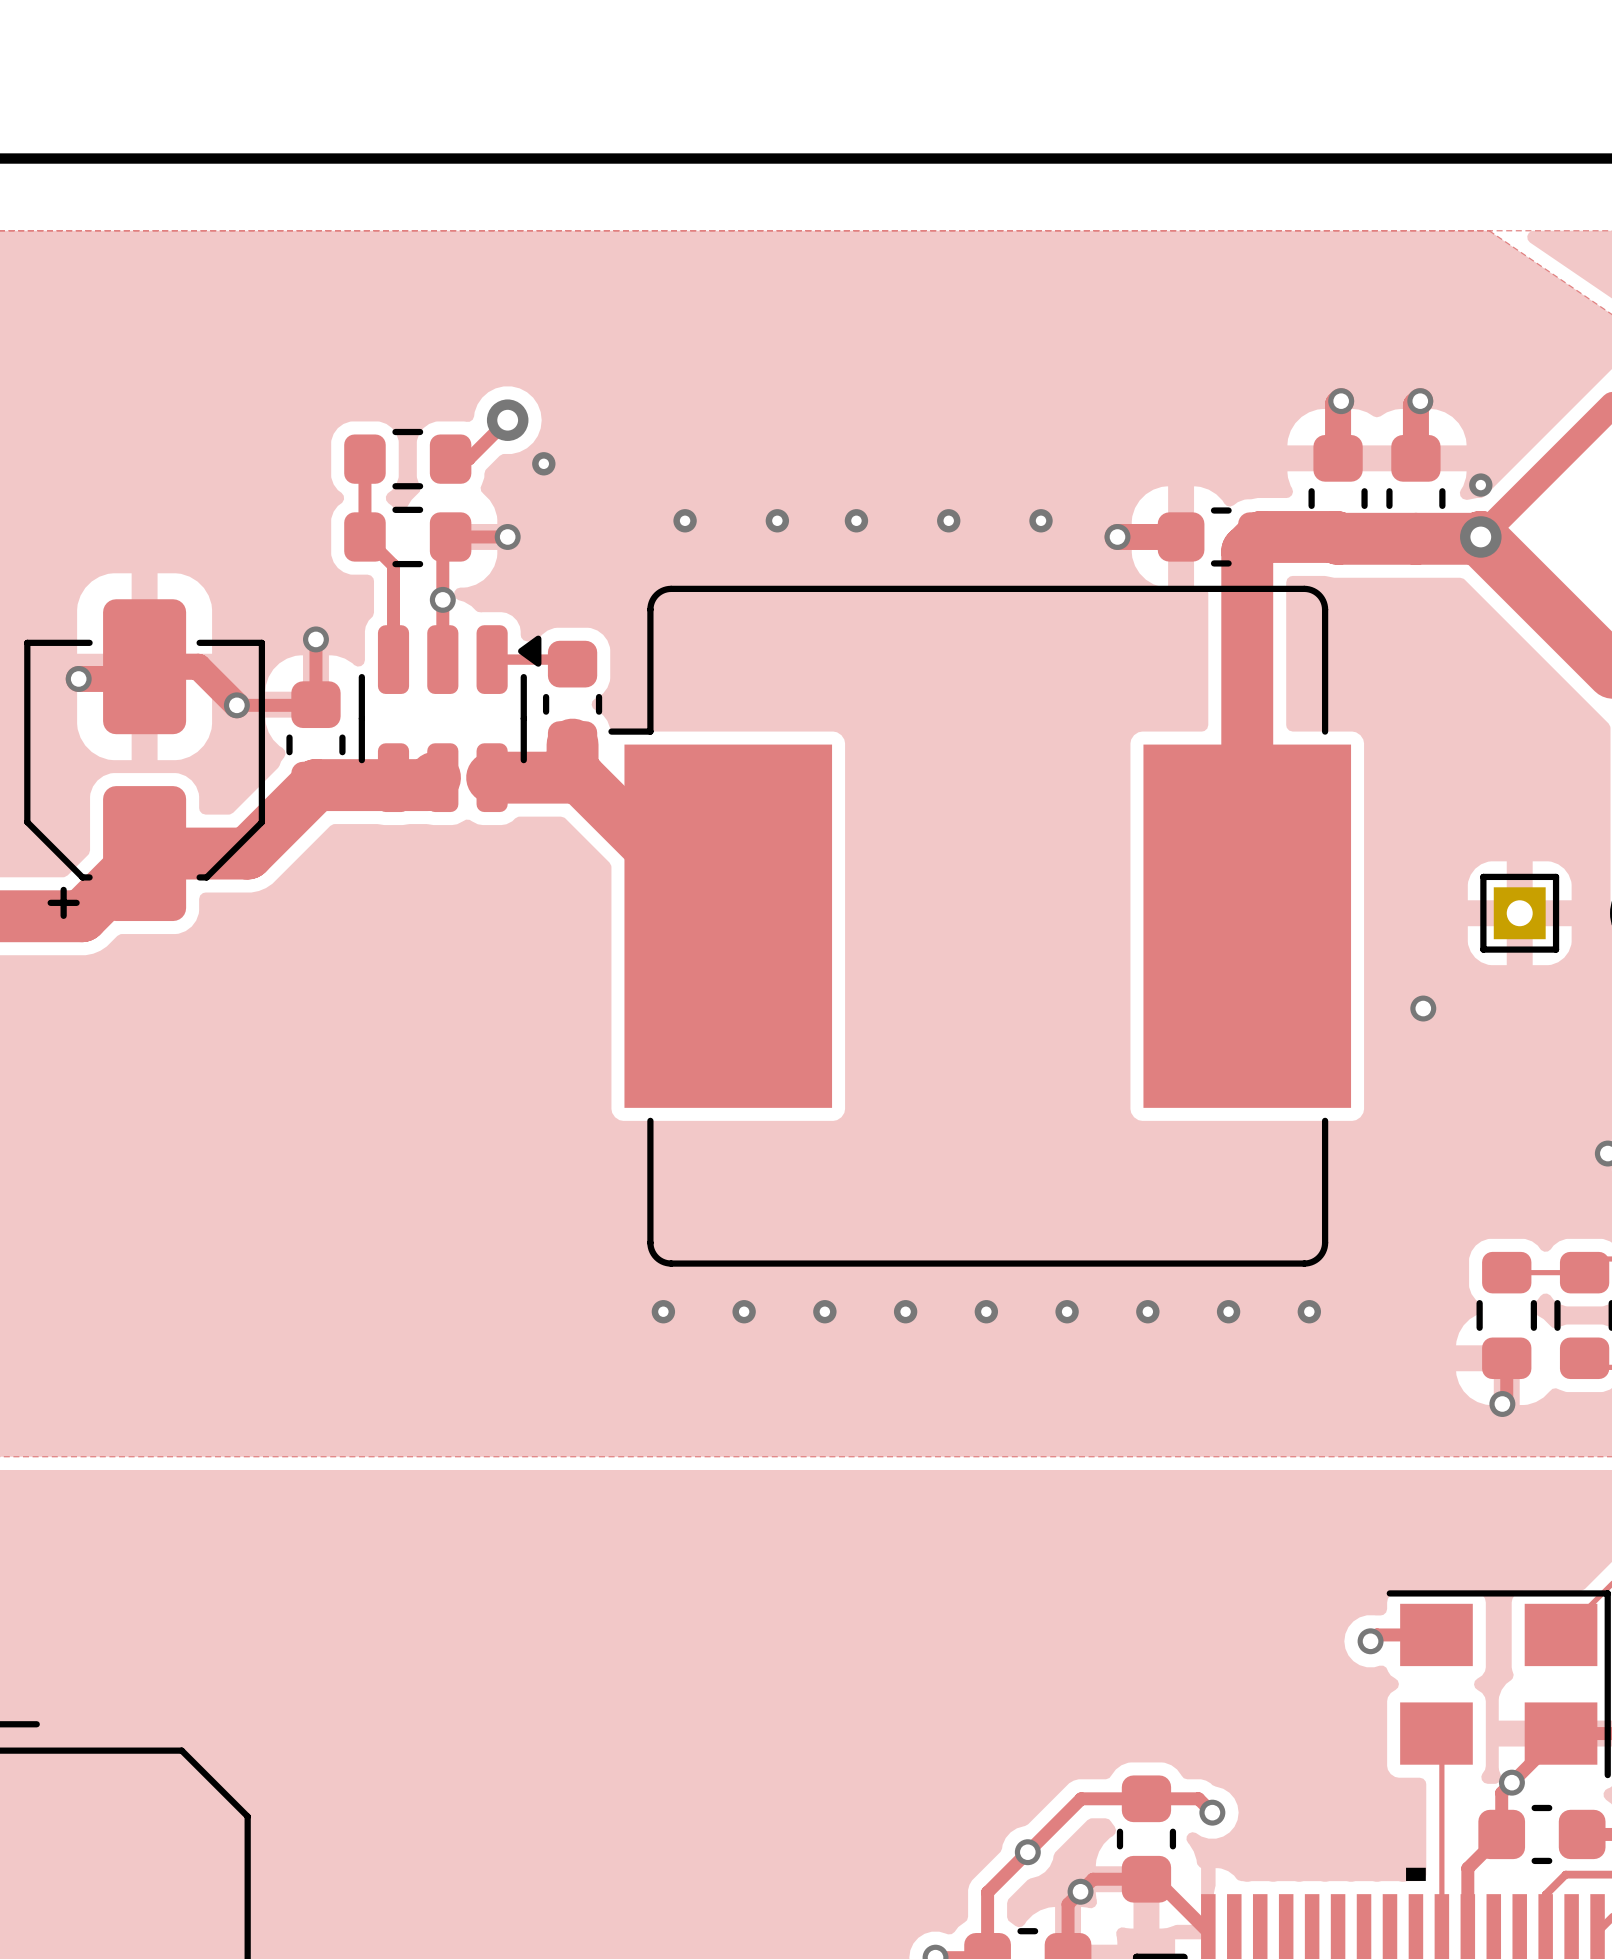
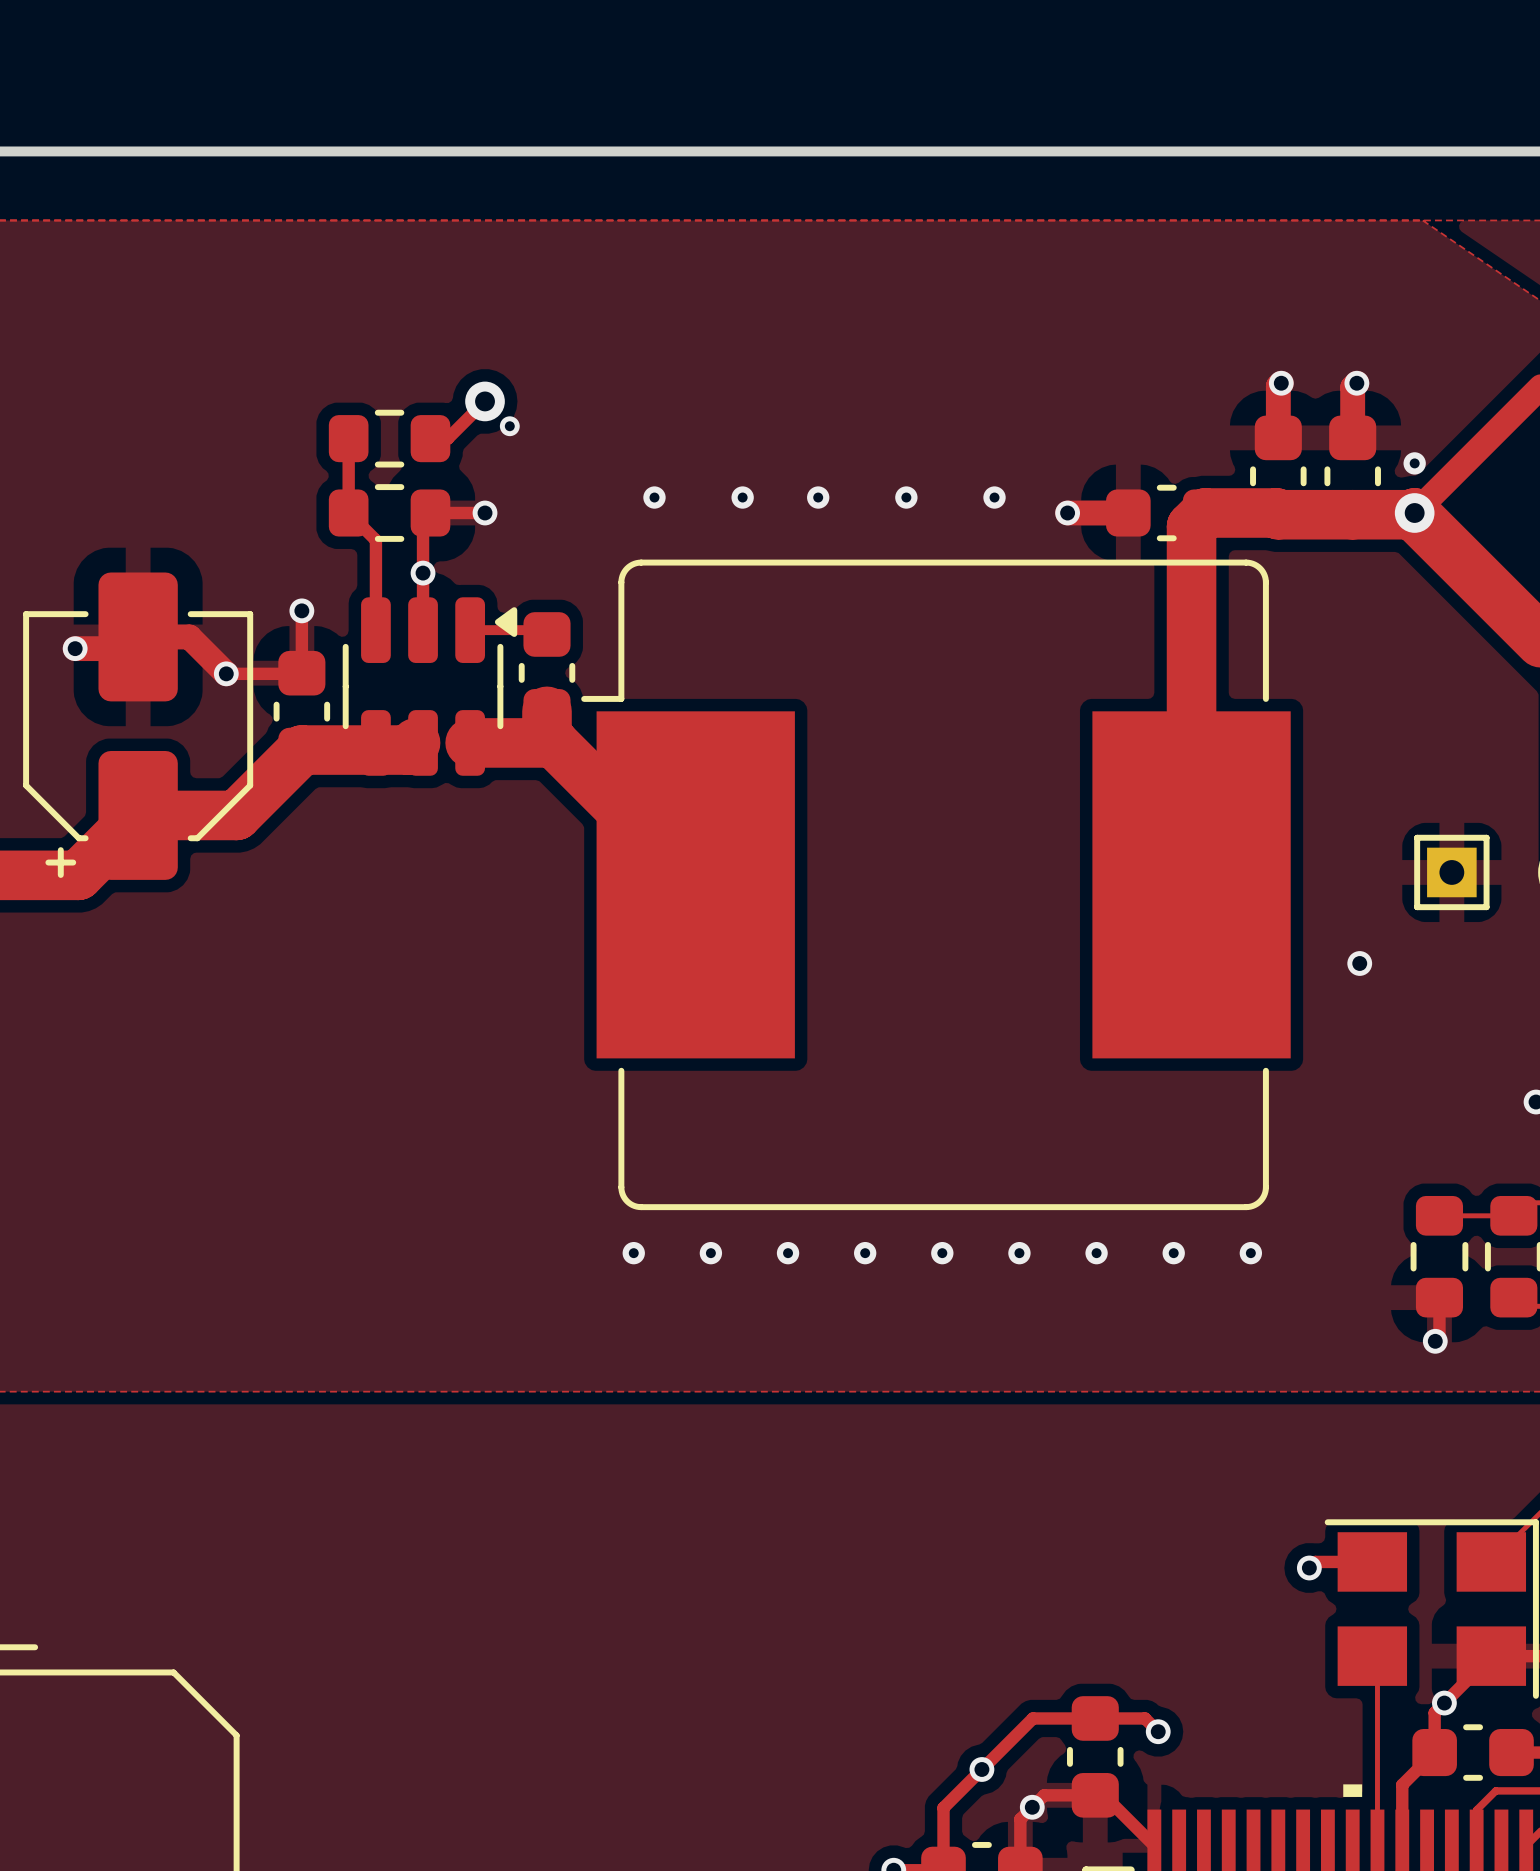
via position: (543, 463) -> (509, 426)

